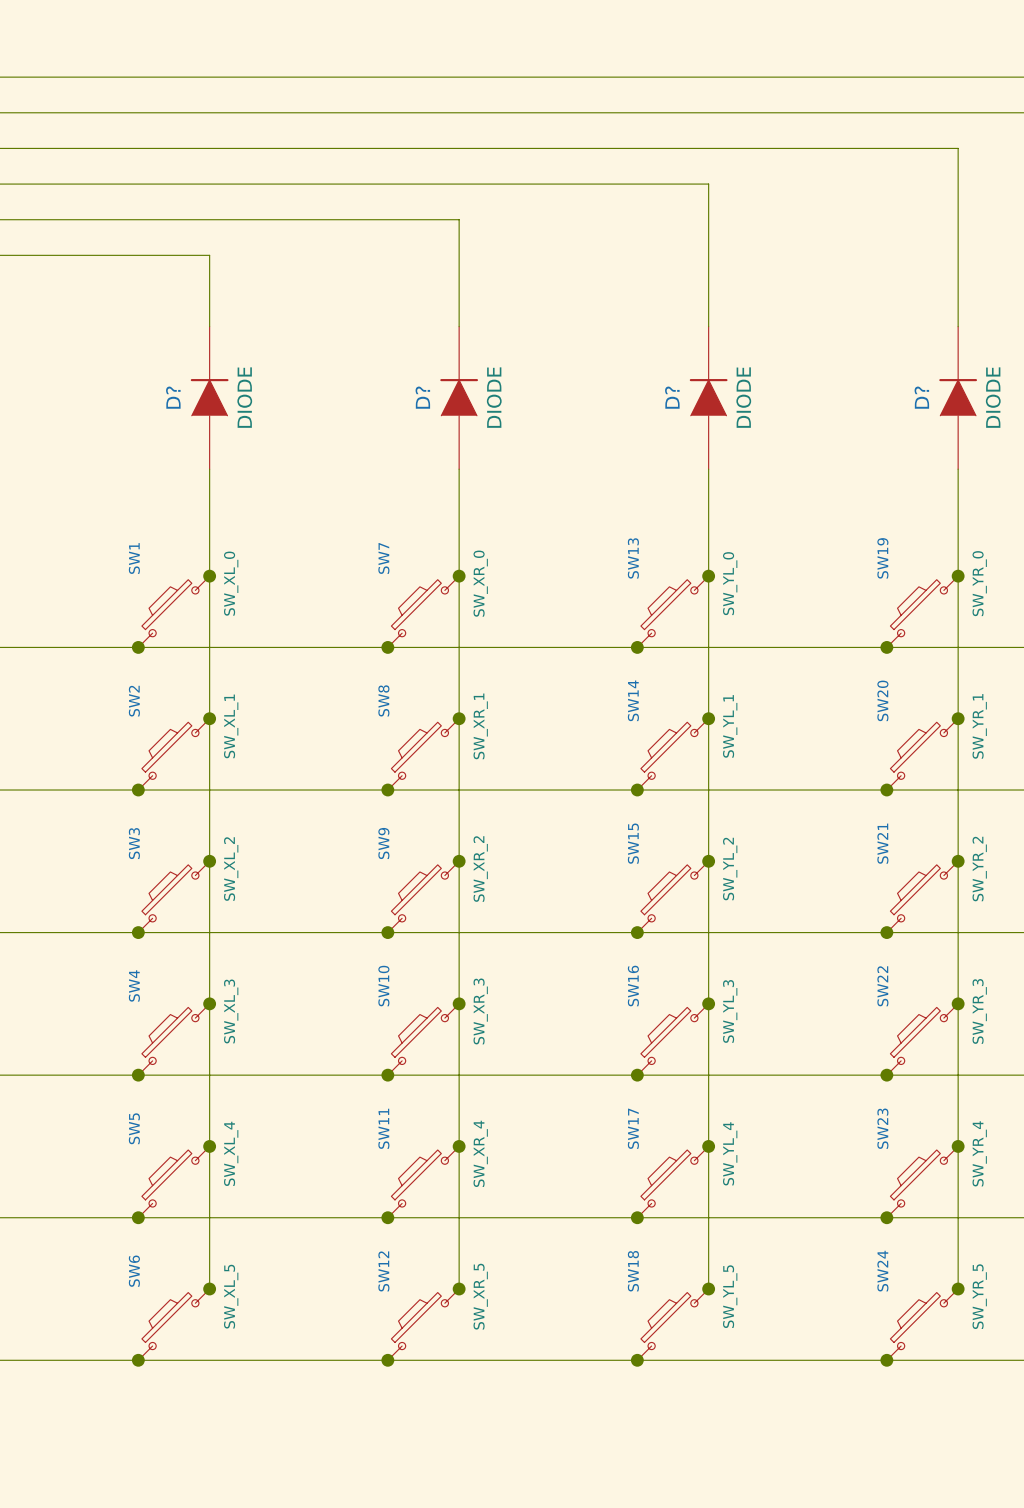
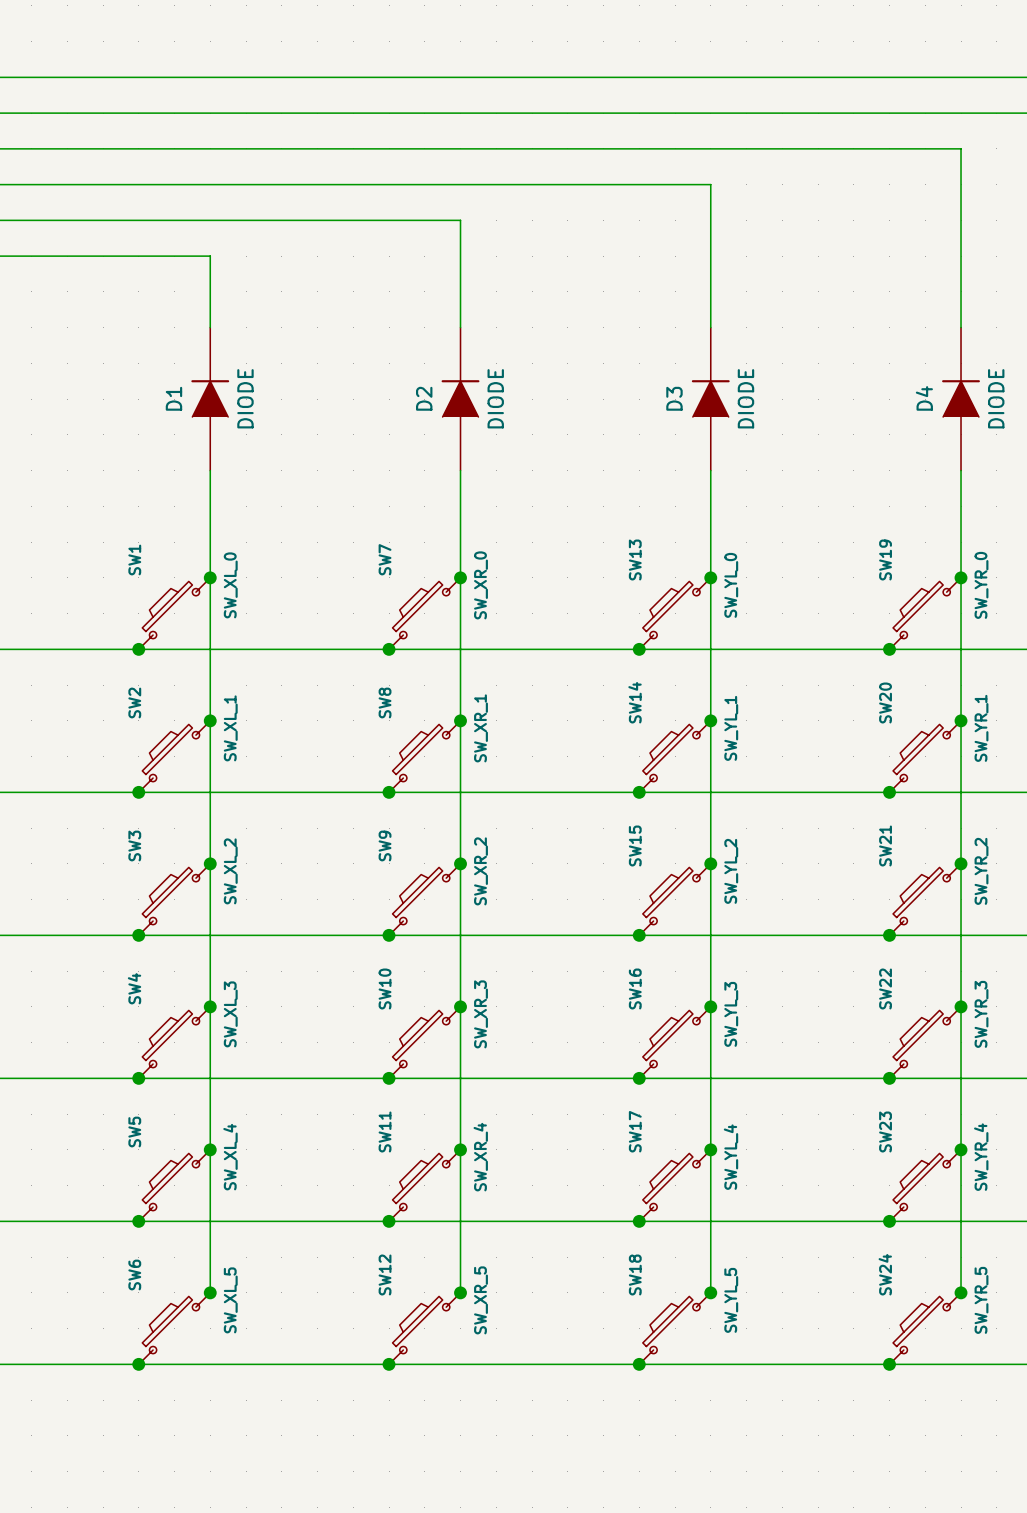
D? name: D? (173, 397) -> D1 (173, 398)
D? name: D? (422, 397) -> D2 (424, 398)
D? name: D? (672, 397) -> D3 (674, 398)
D? name: D? (921, 397) -> D4 (924, 398)

